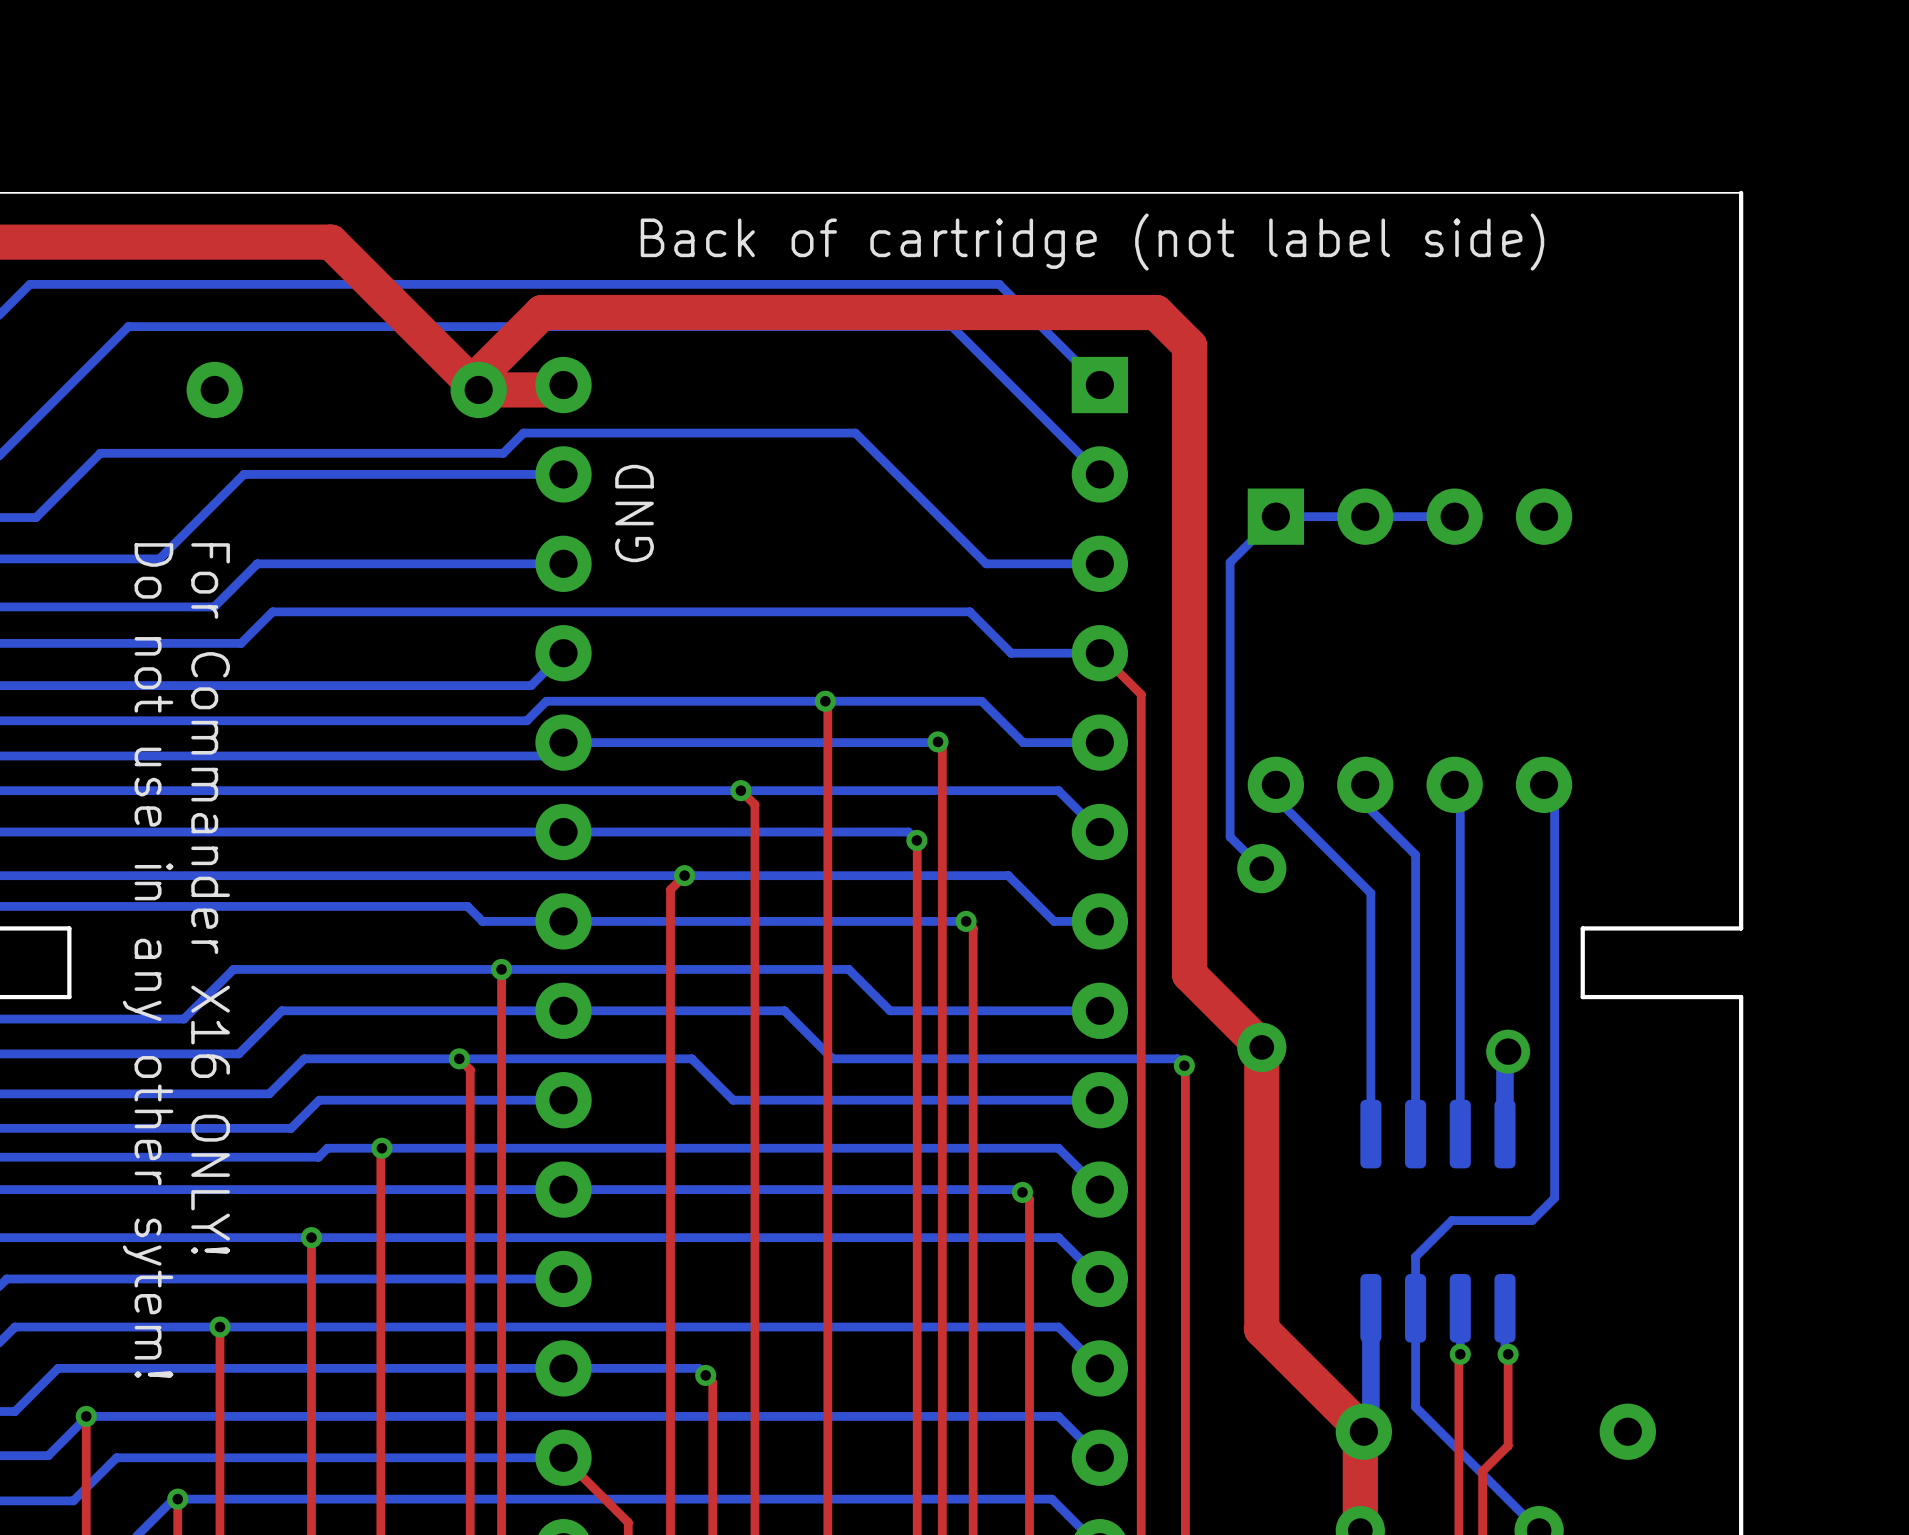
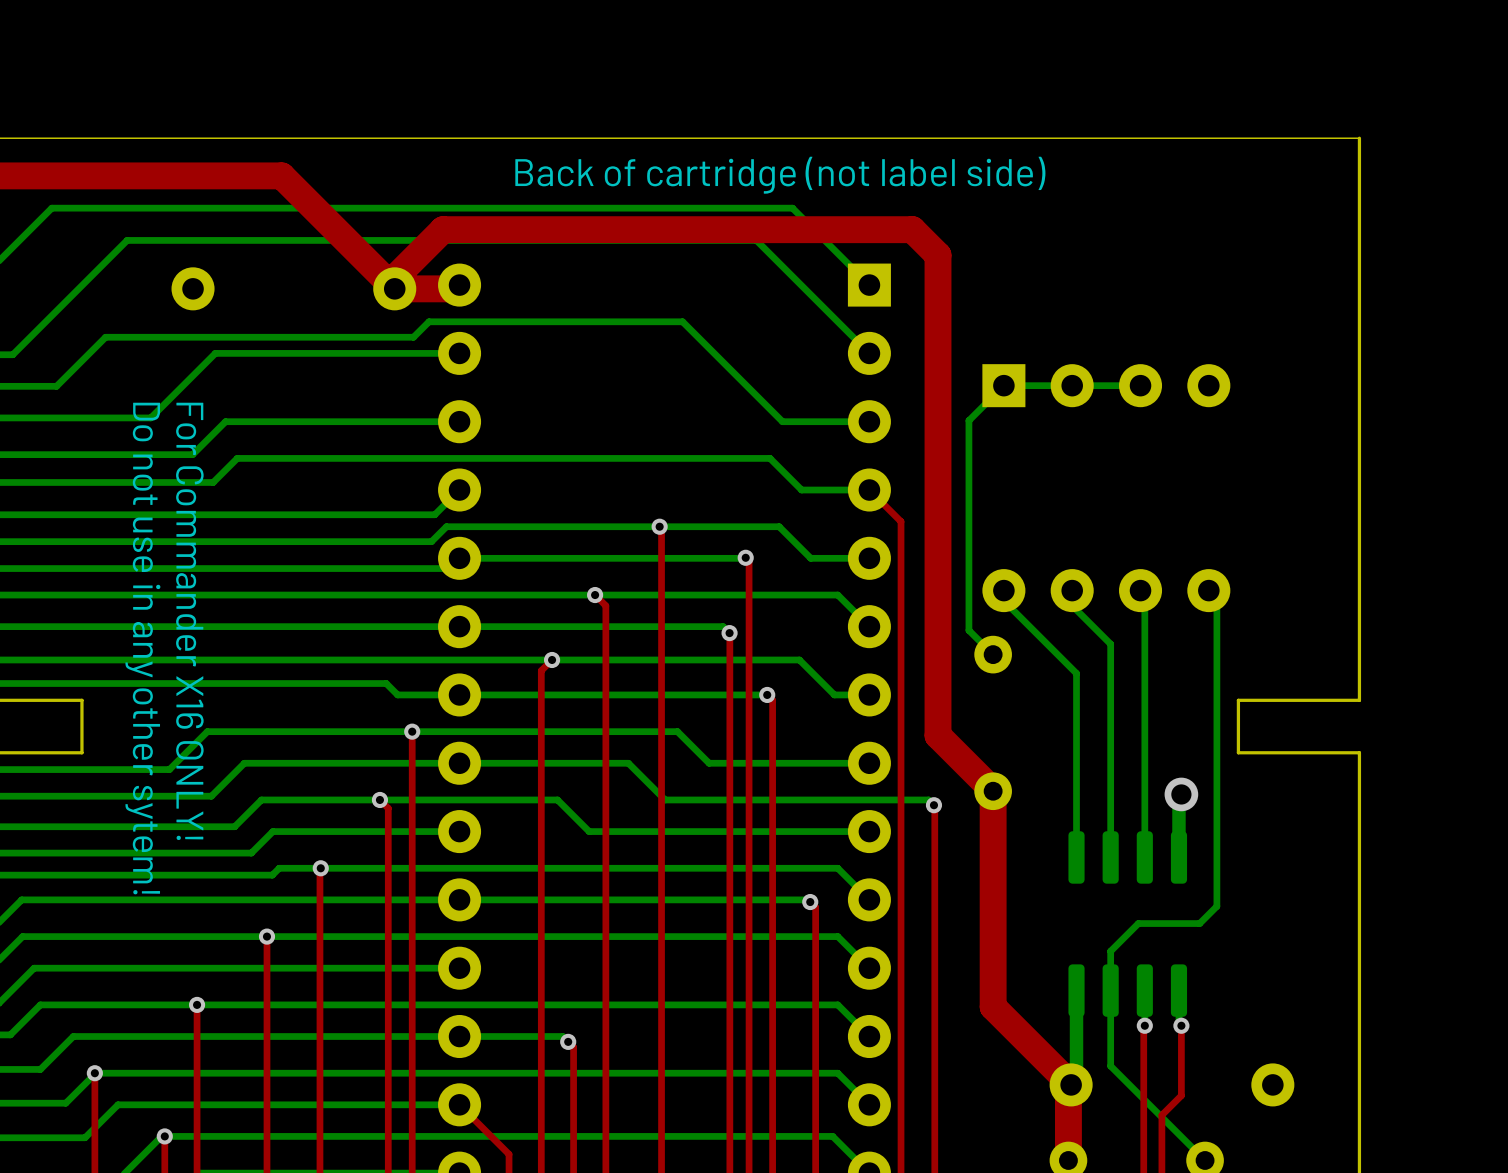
text: GND (634, 513) -> none

